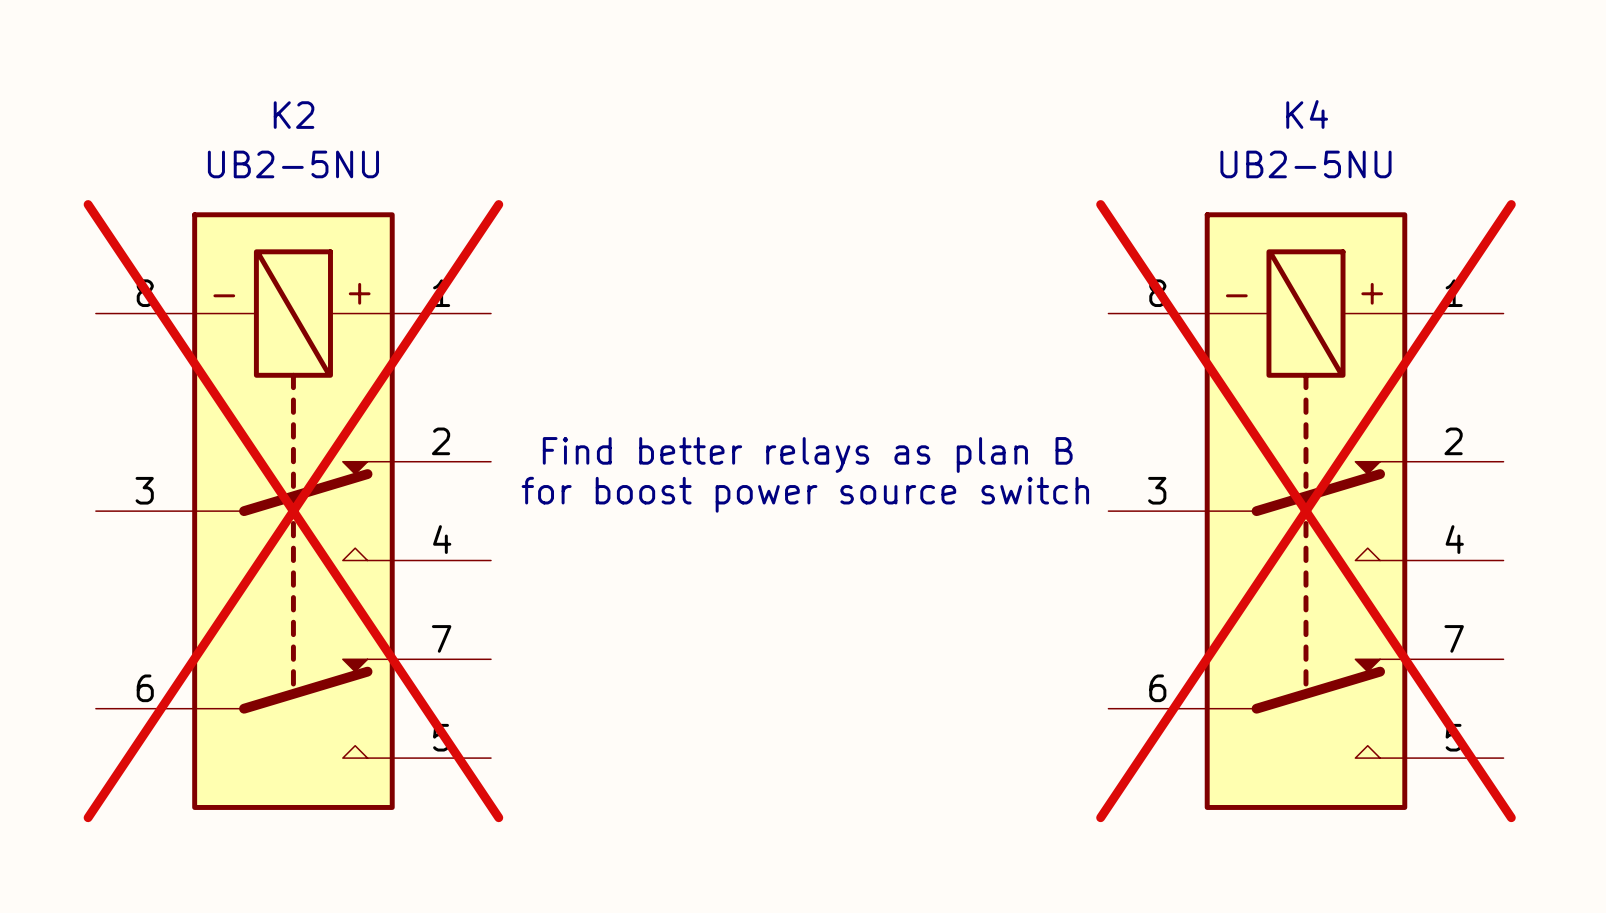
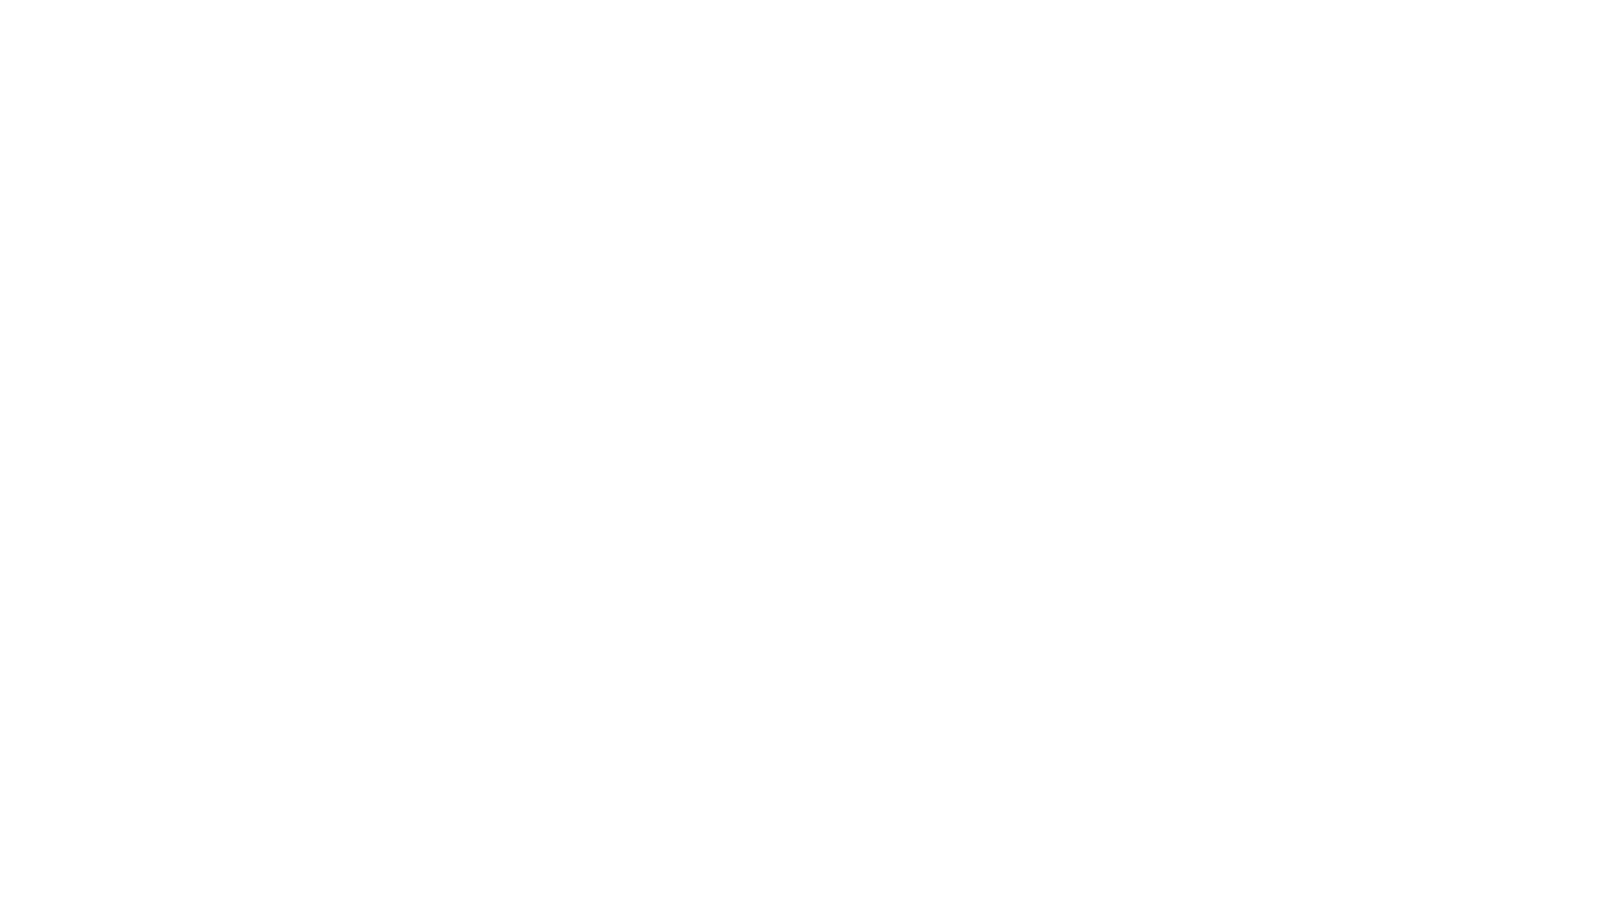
text: Find better relays as plan B (807, 455) -> none
text: for boost power source switch (805, 494) -> none
K2: UB2-5NU (293, 511) -> none
K4: UB2-5NU (1305, 511) -> none

